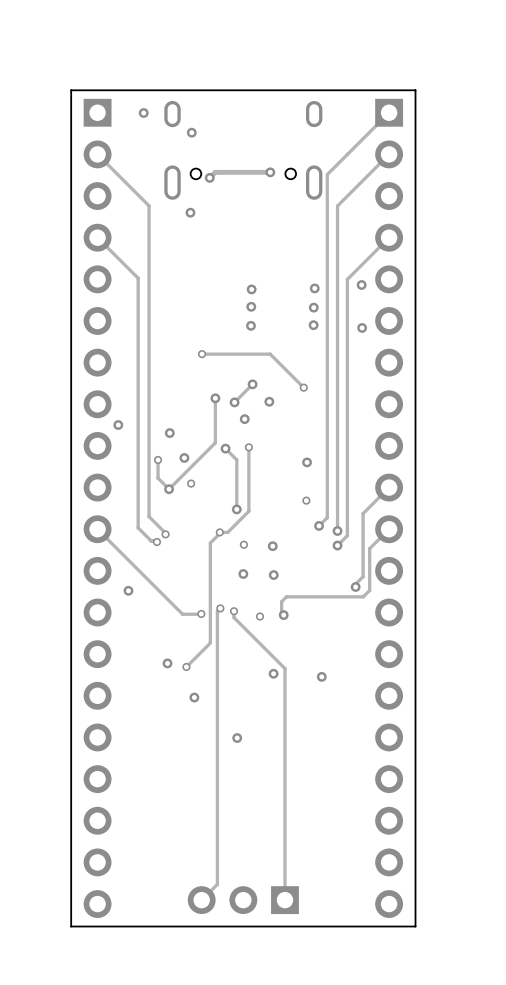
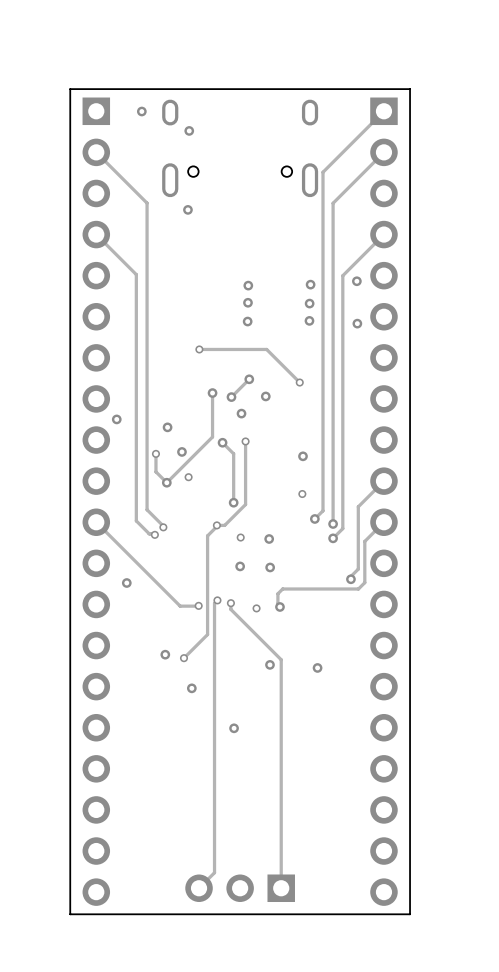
track: (270, 172) (215, 172) (209, 177) -> none
via: (270, 172) -> none
via: (209, 177) -> none

